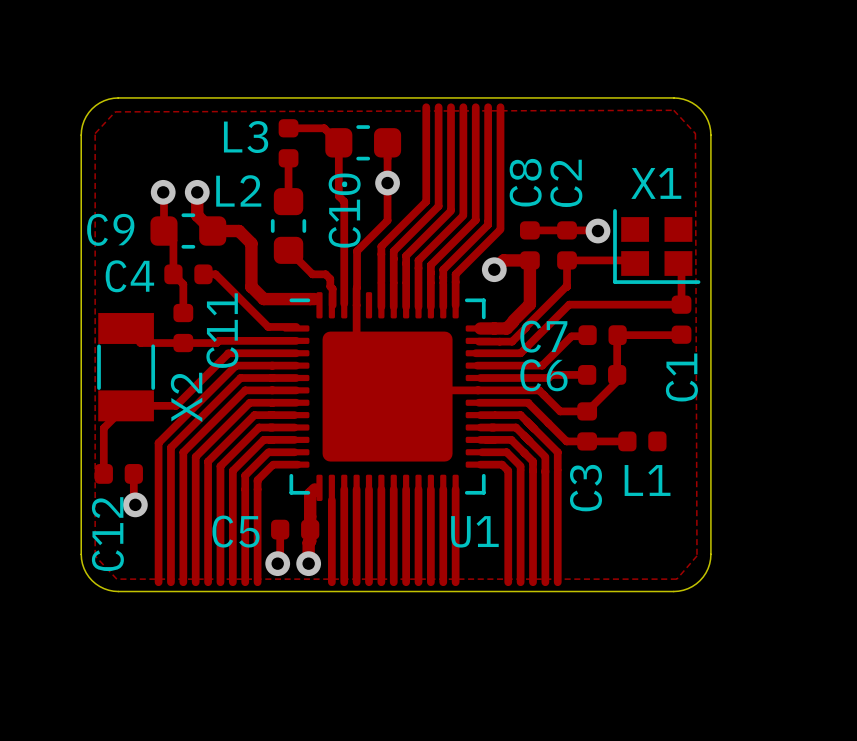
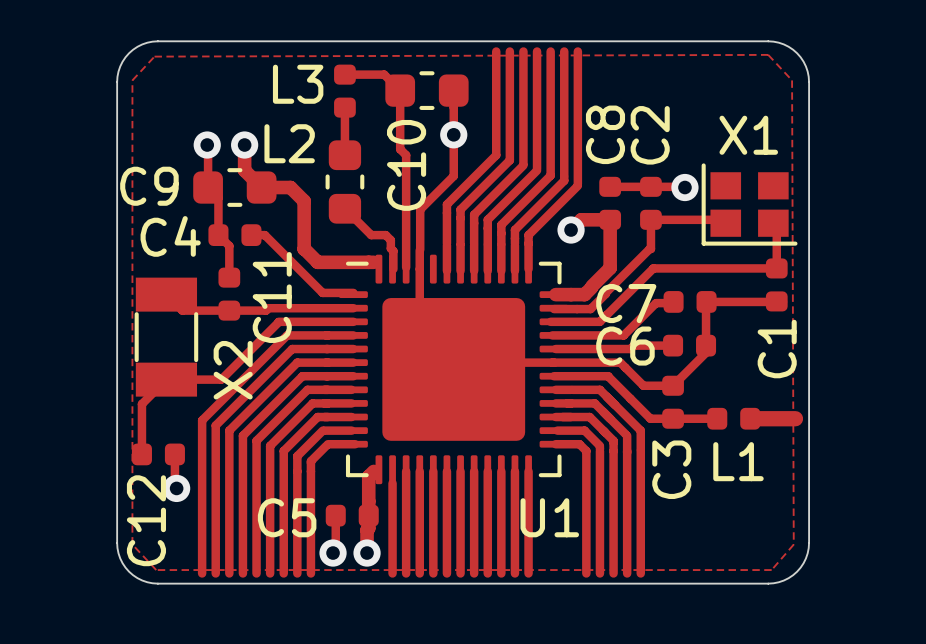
track: none -> (750, 418) (795, 418)

